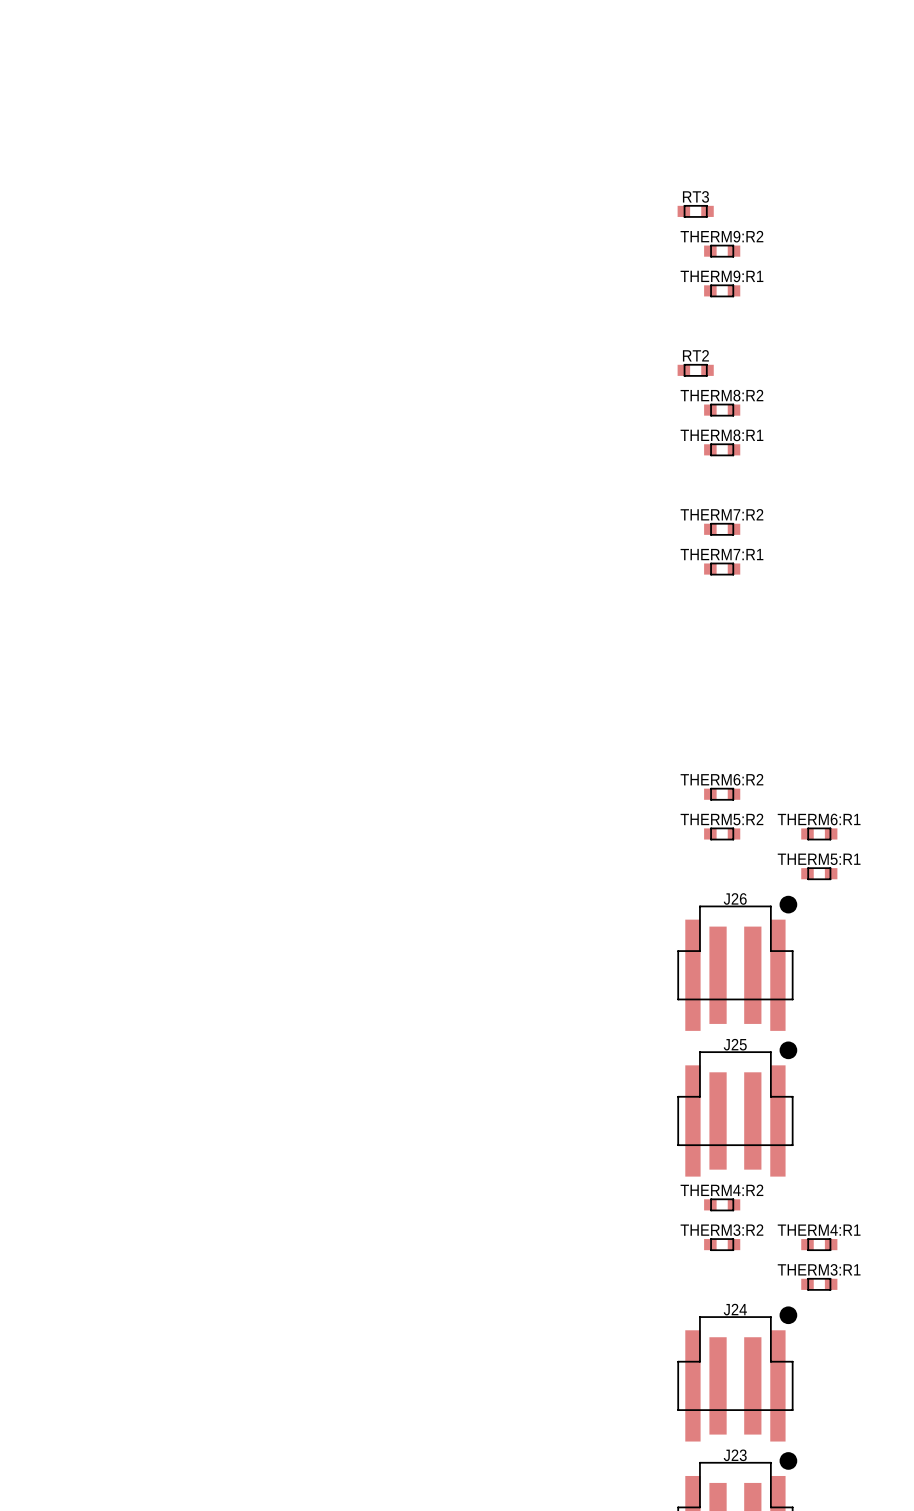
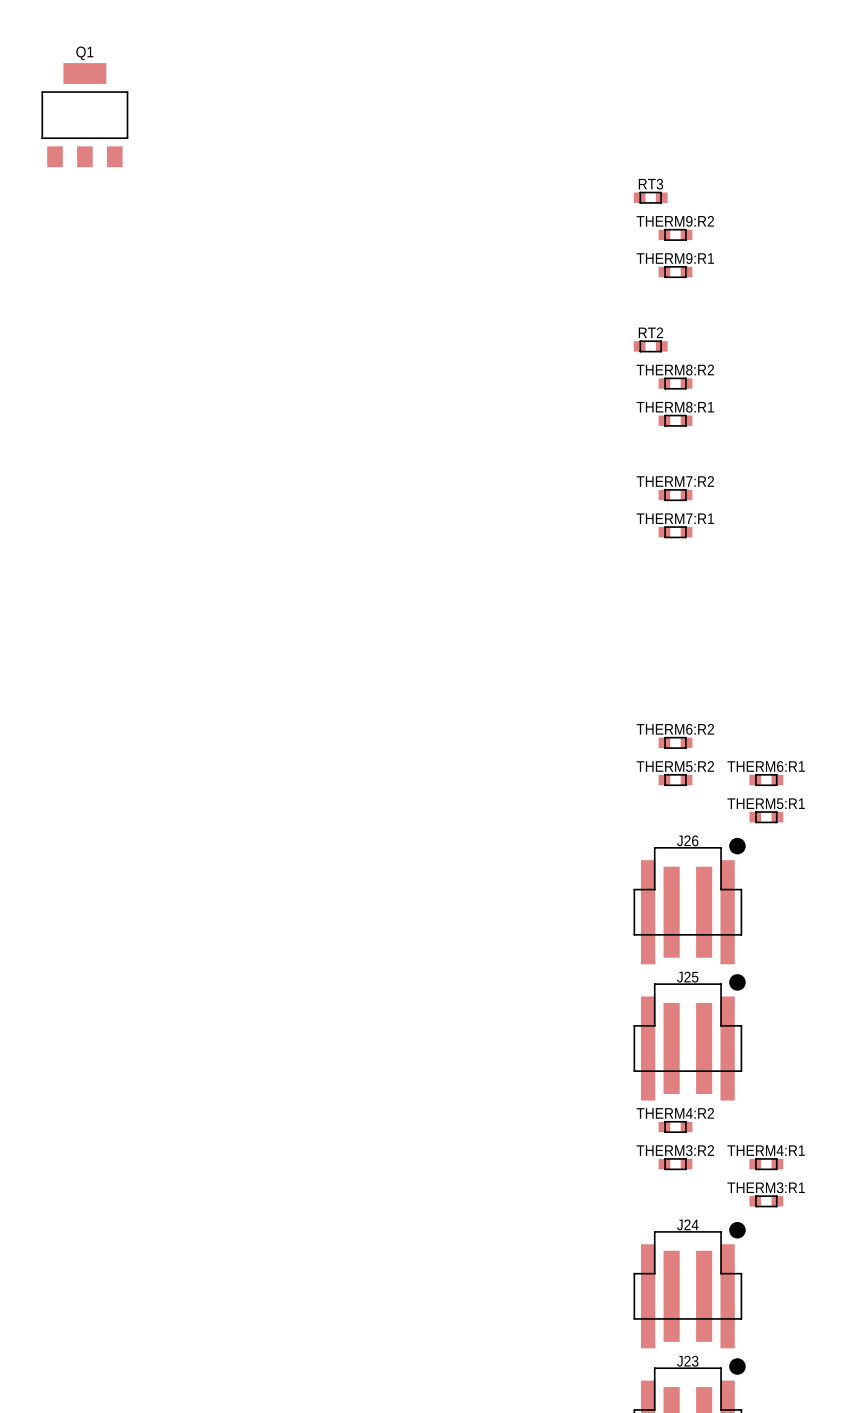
Q1: none -> (84, 115)

